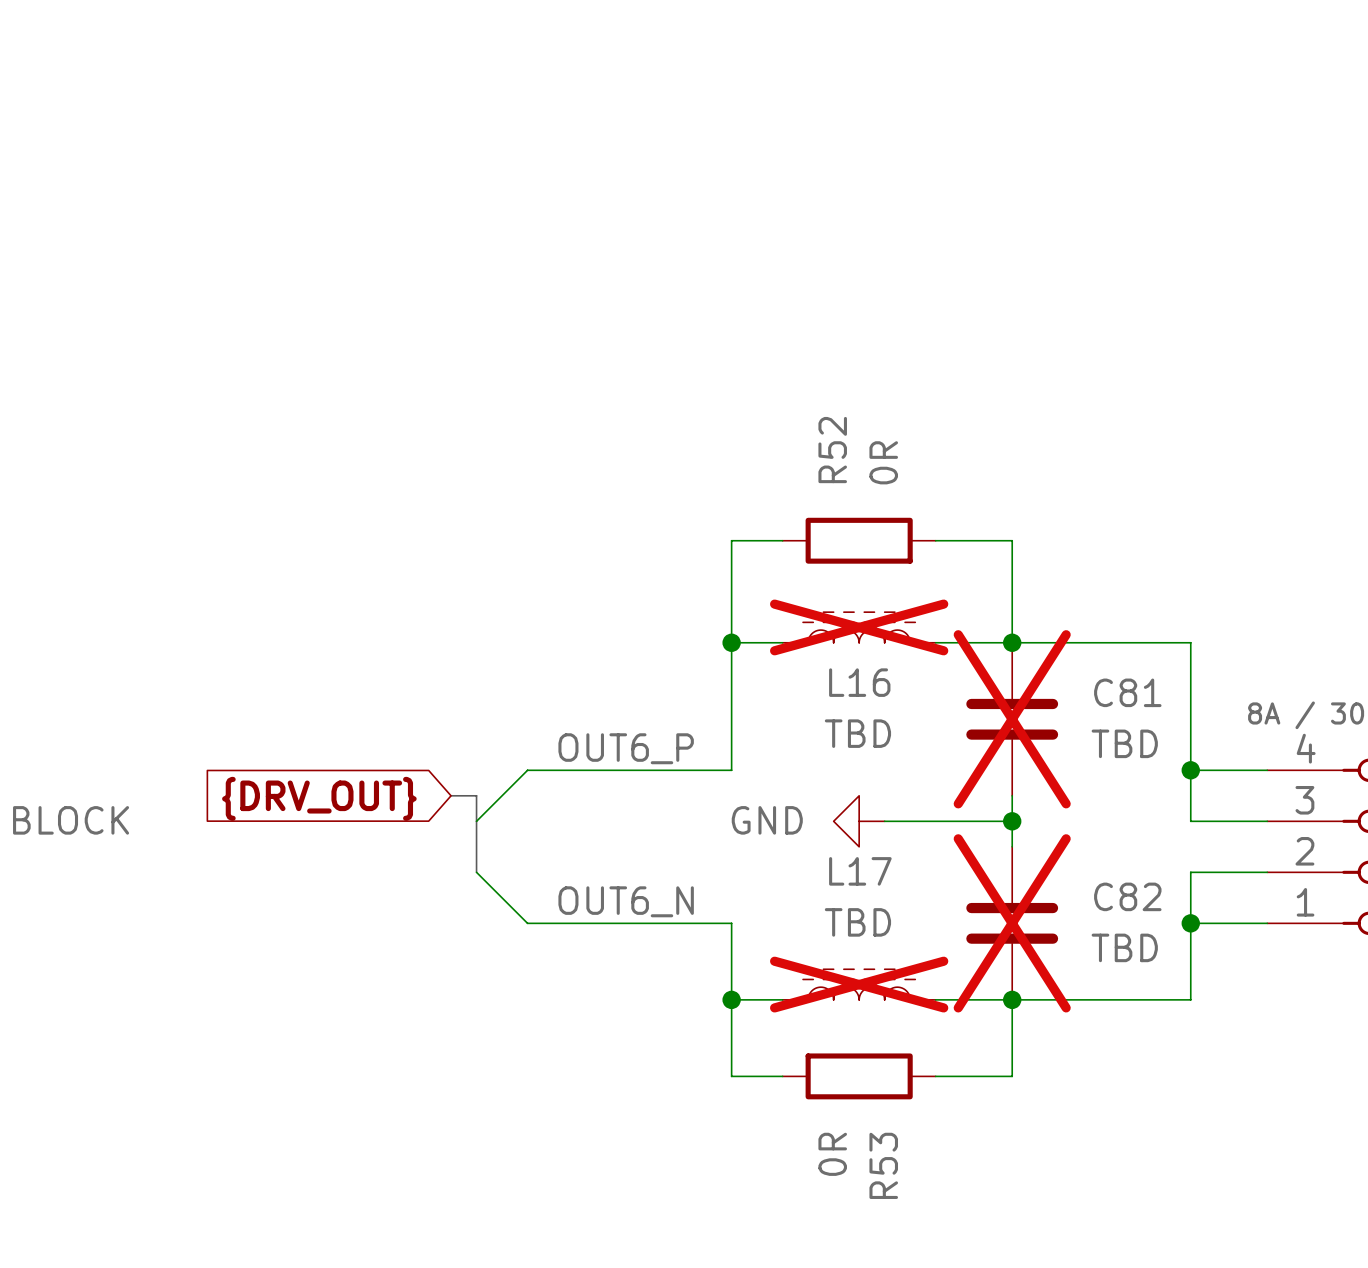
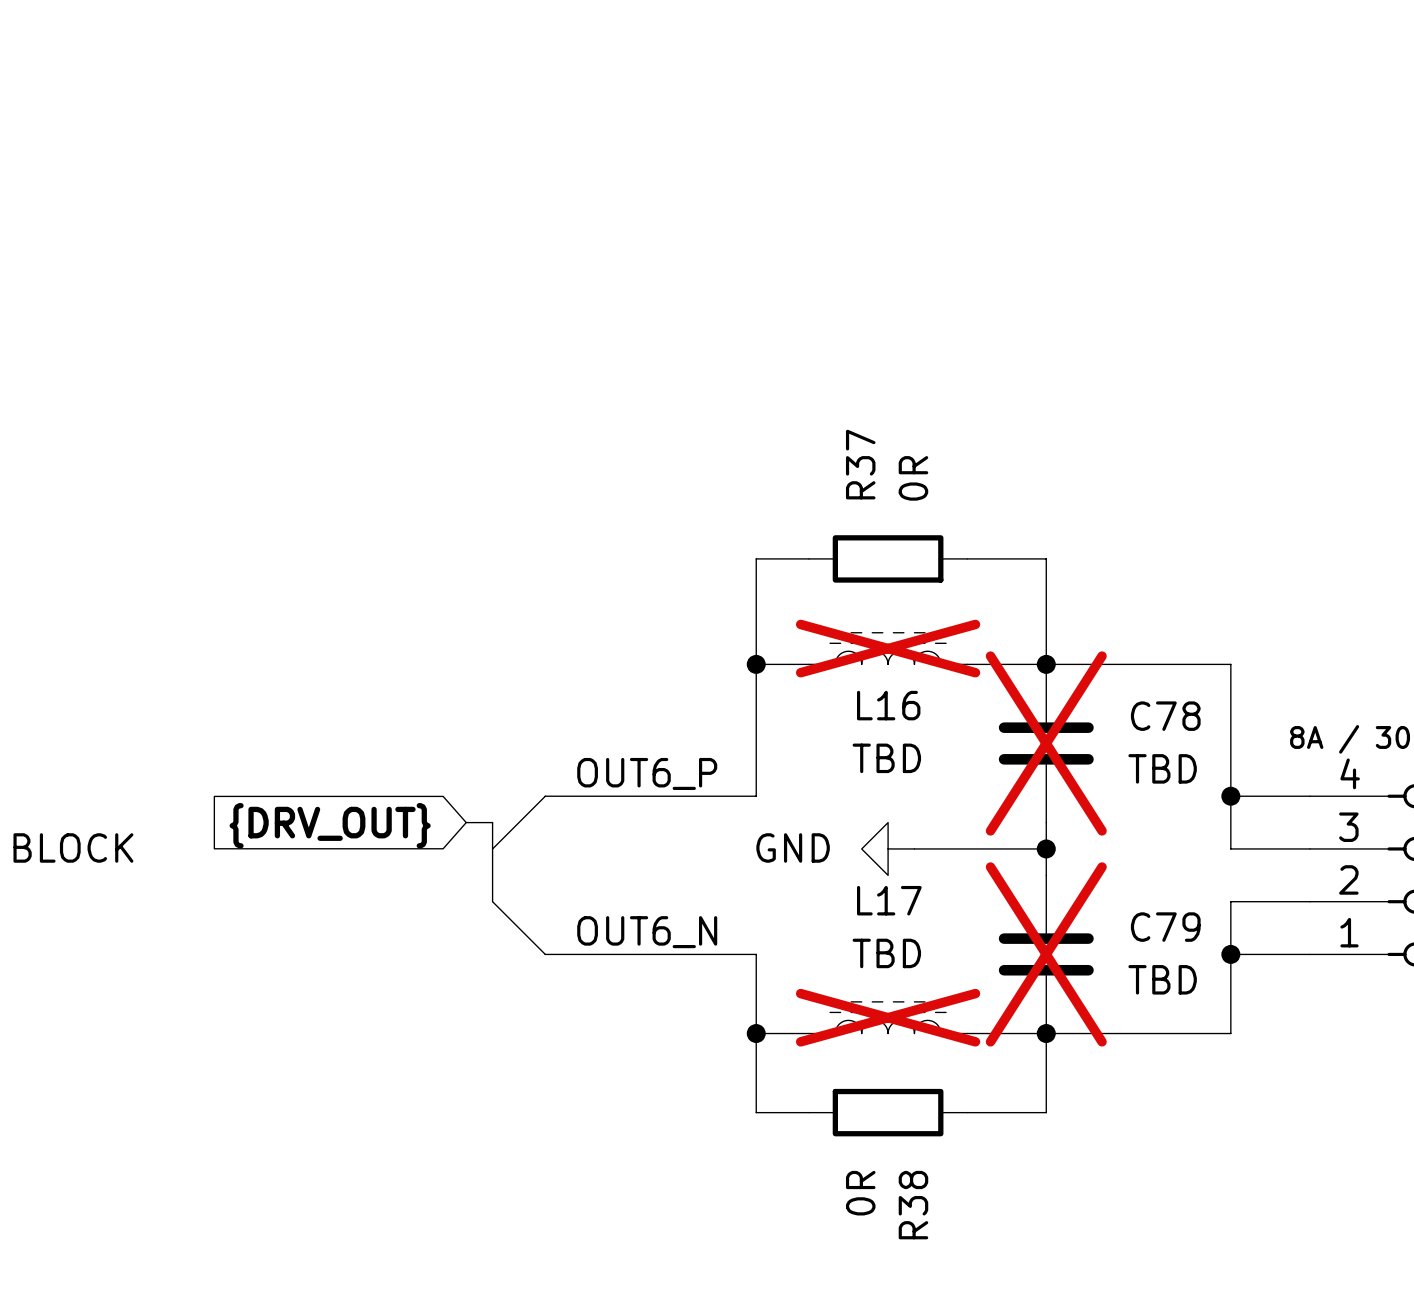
R52 name: R52 (832, 450) -> R37 (860, 464)
C81 name: C81 (1127, 692) -> C78 (1165, 716)
C82 name: C82 (1127, 896) -> C79 (1165, 927)
R53 name: R53 (883, 1165) -> R38 (913, 1205)

